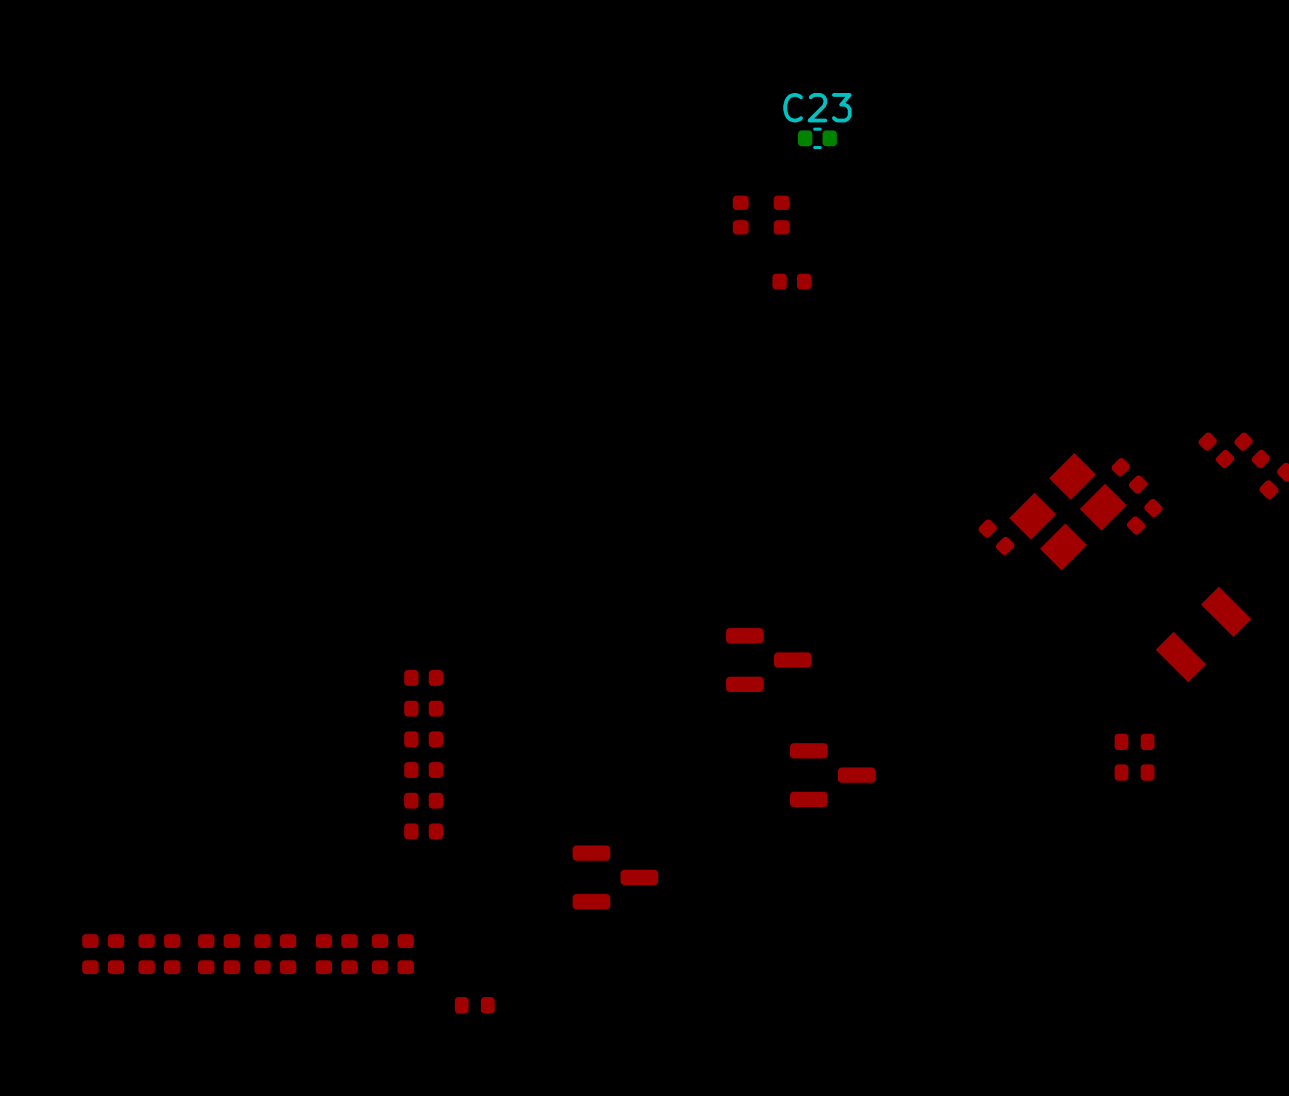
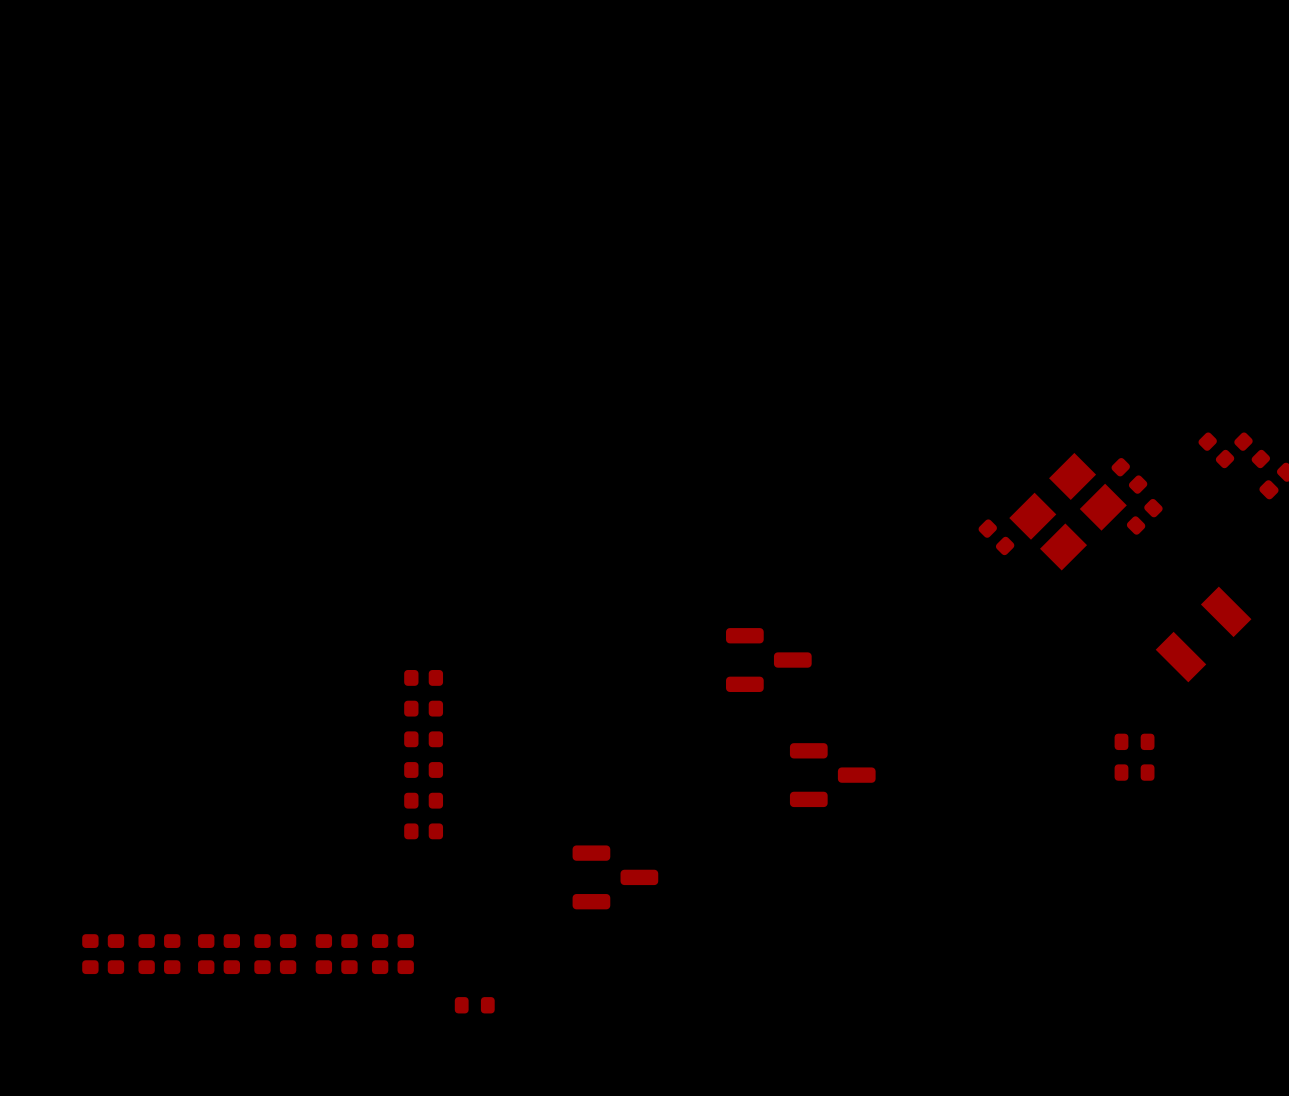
C23: (817, 138) -> none
part: (740, 215) -> none
part: (781, 215) -> none
part: (791, 281) -> none

